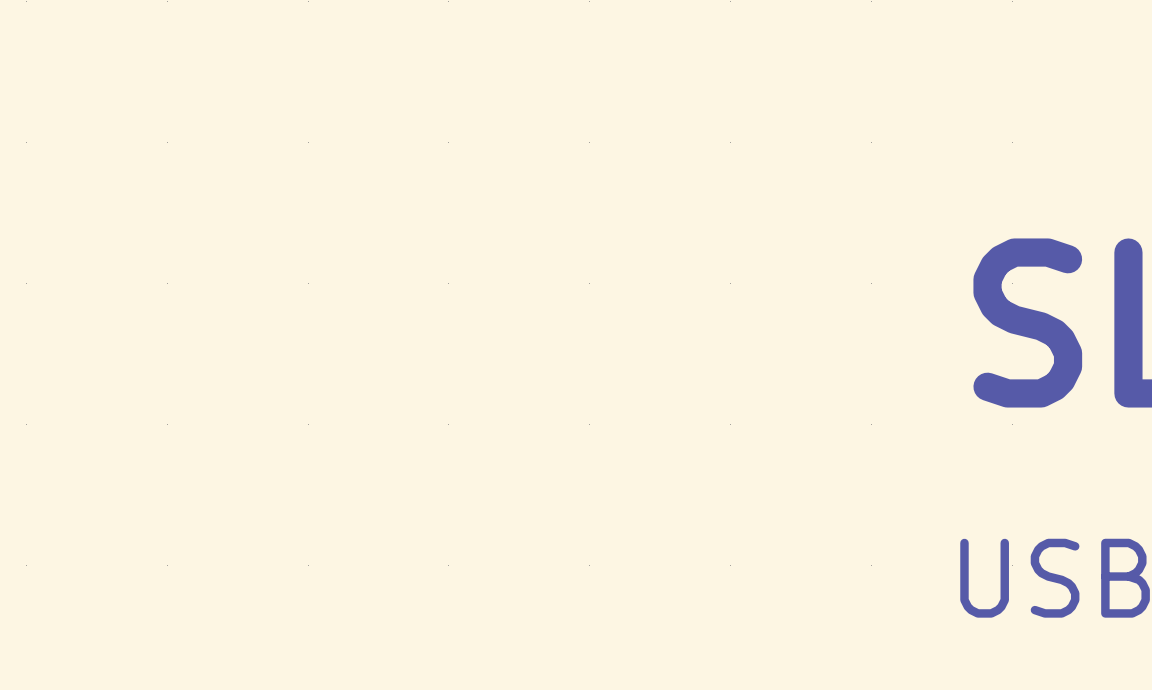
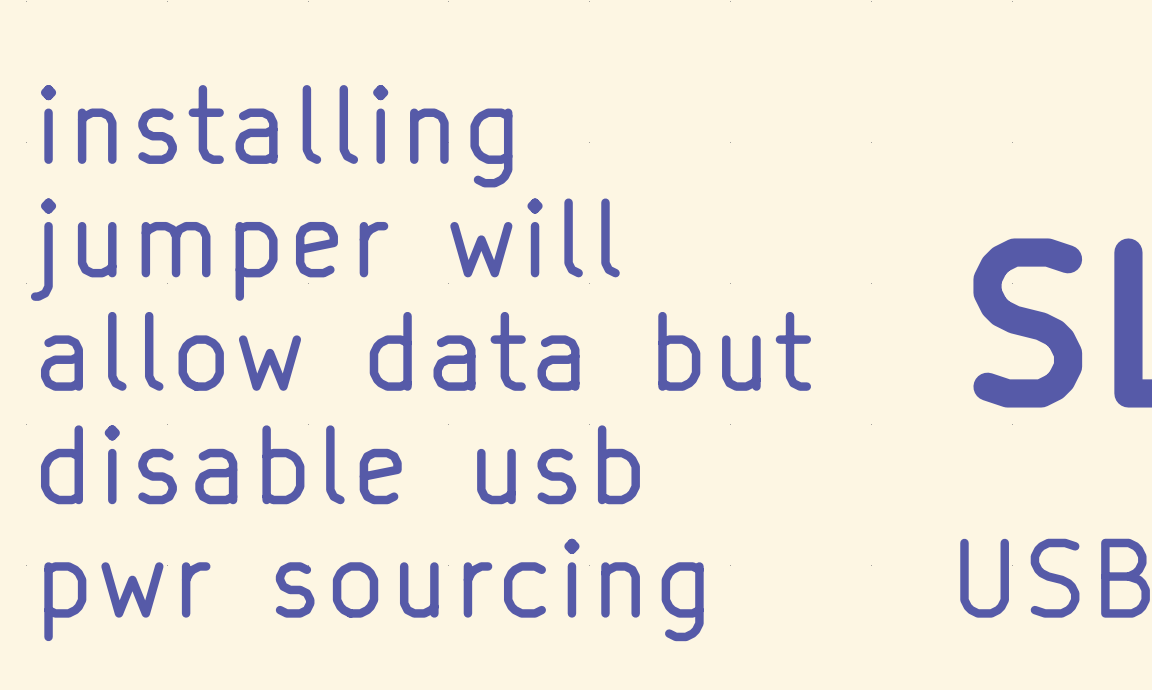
text: none -> installing (276, 136)
text: none -> jumper will (325, 249)
text: none -> allow data but (425, 351)
text: none -> disable usb (340, 464)
text: none -> pwr sourcing (373, 589)

